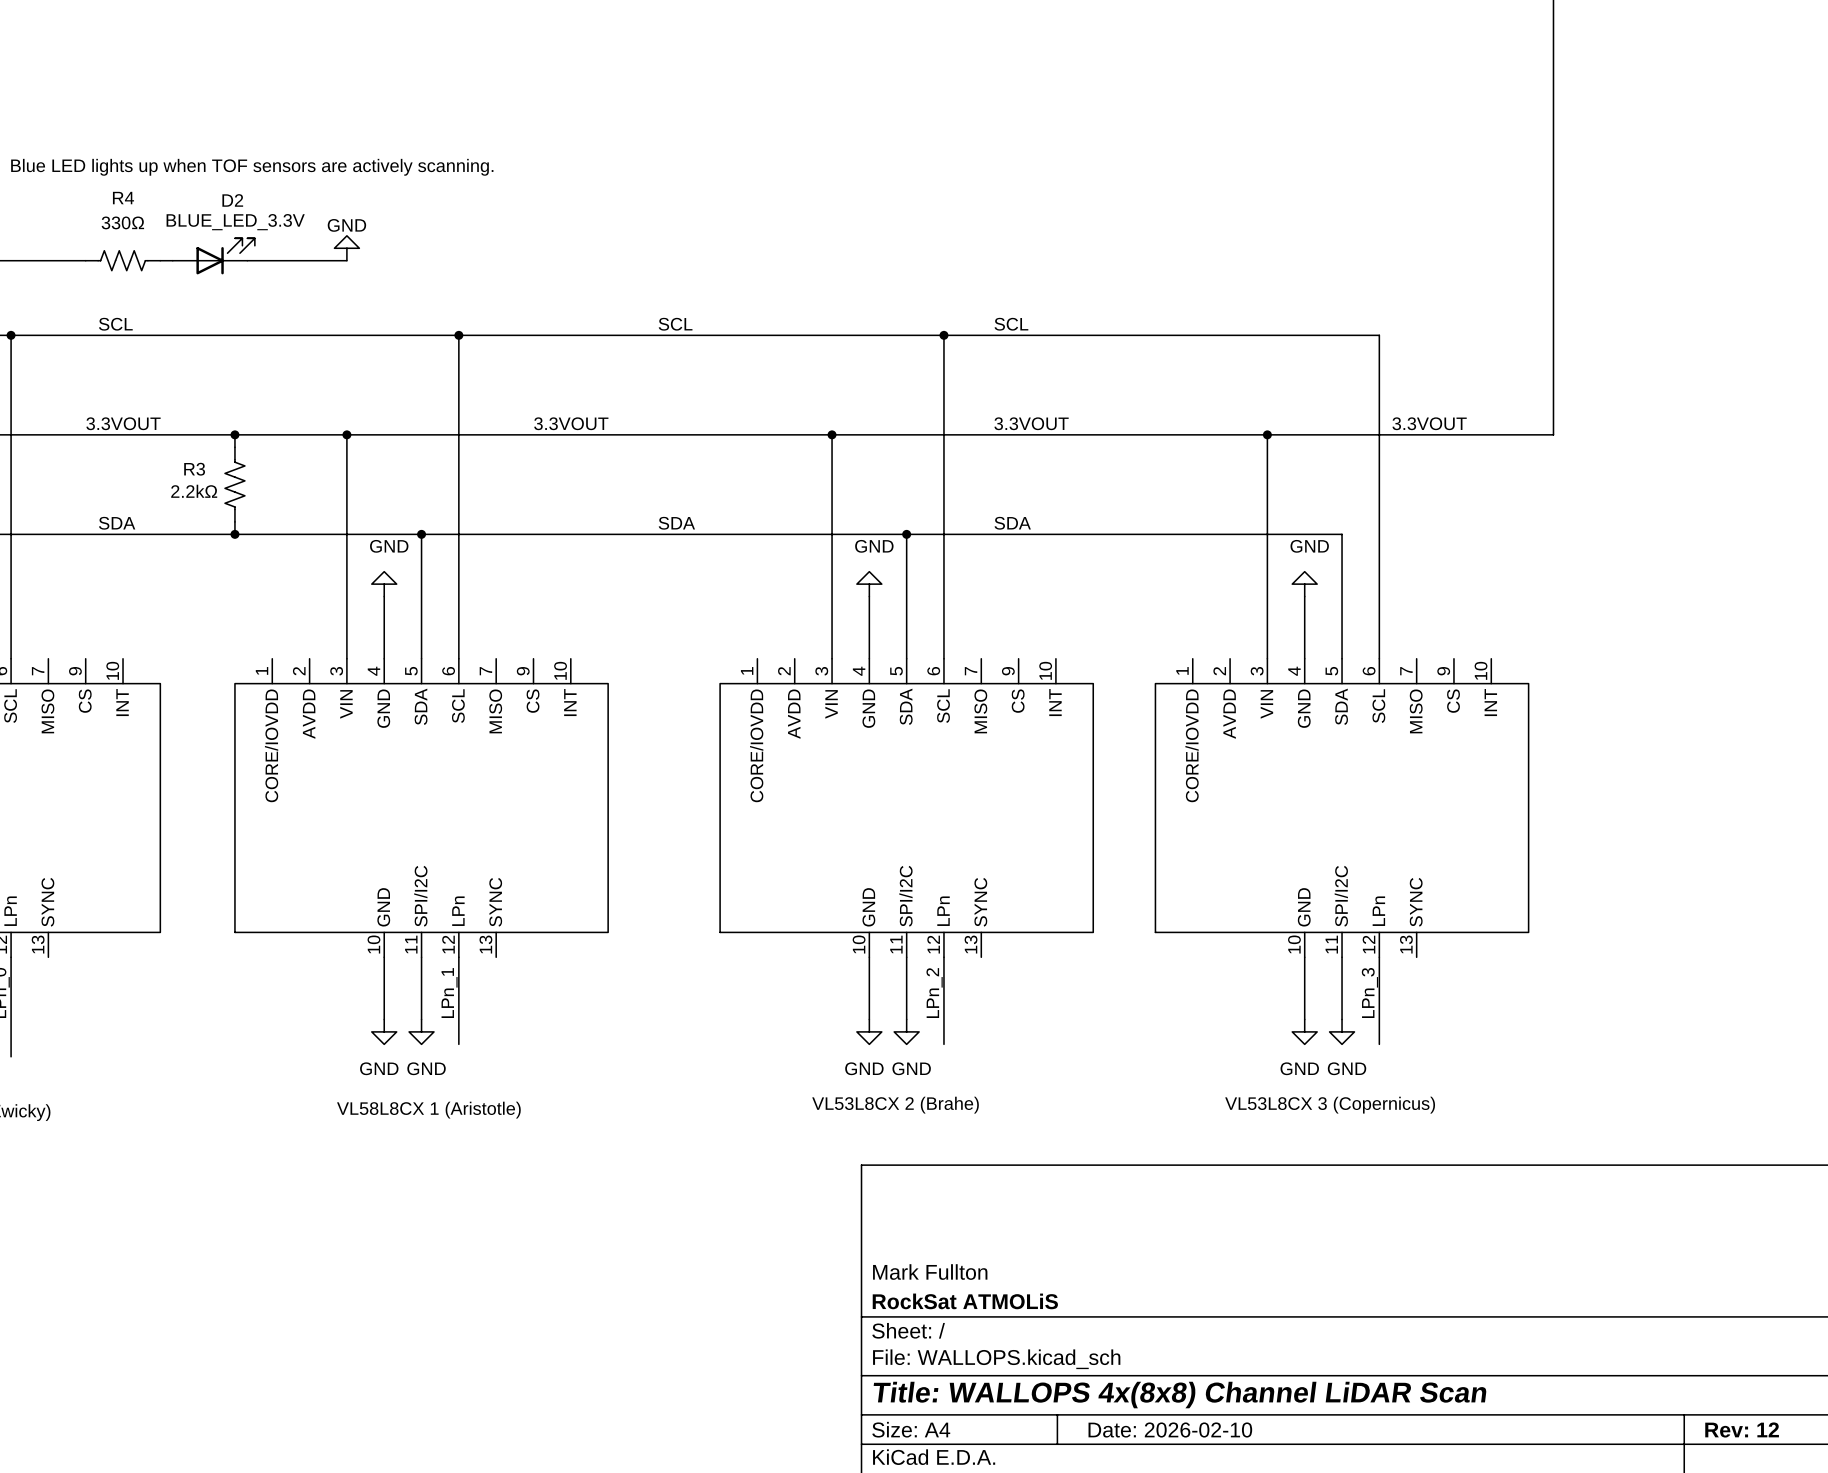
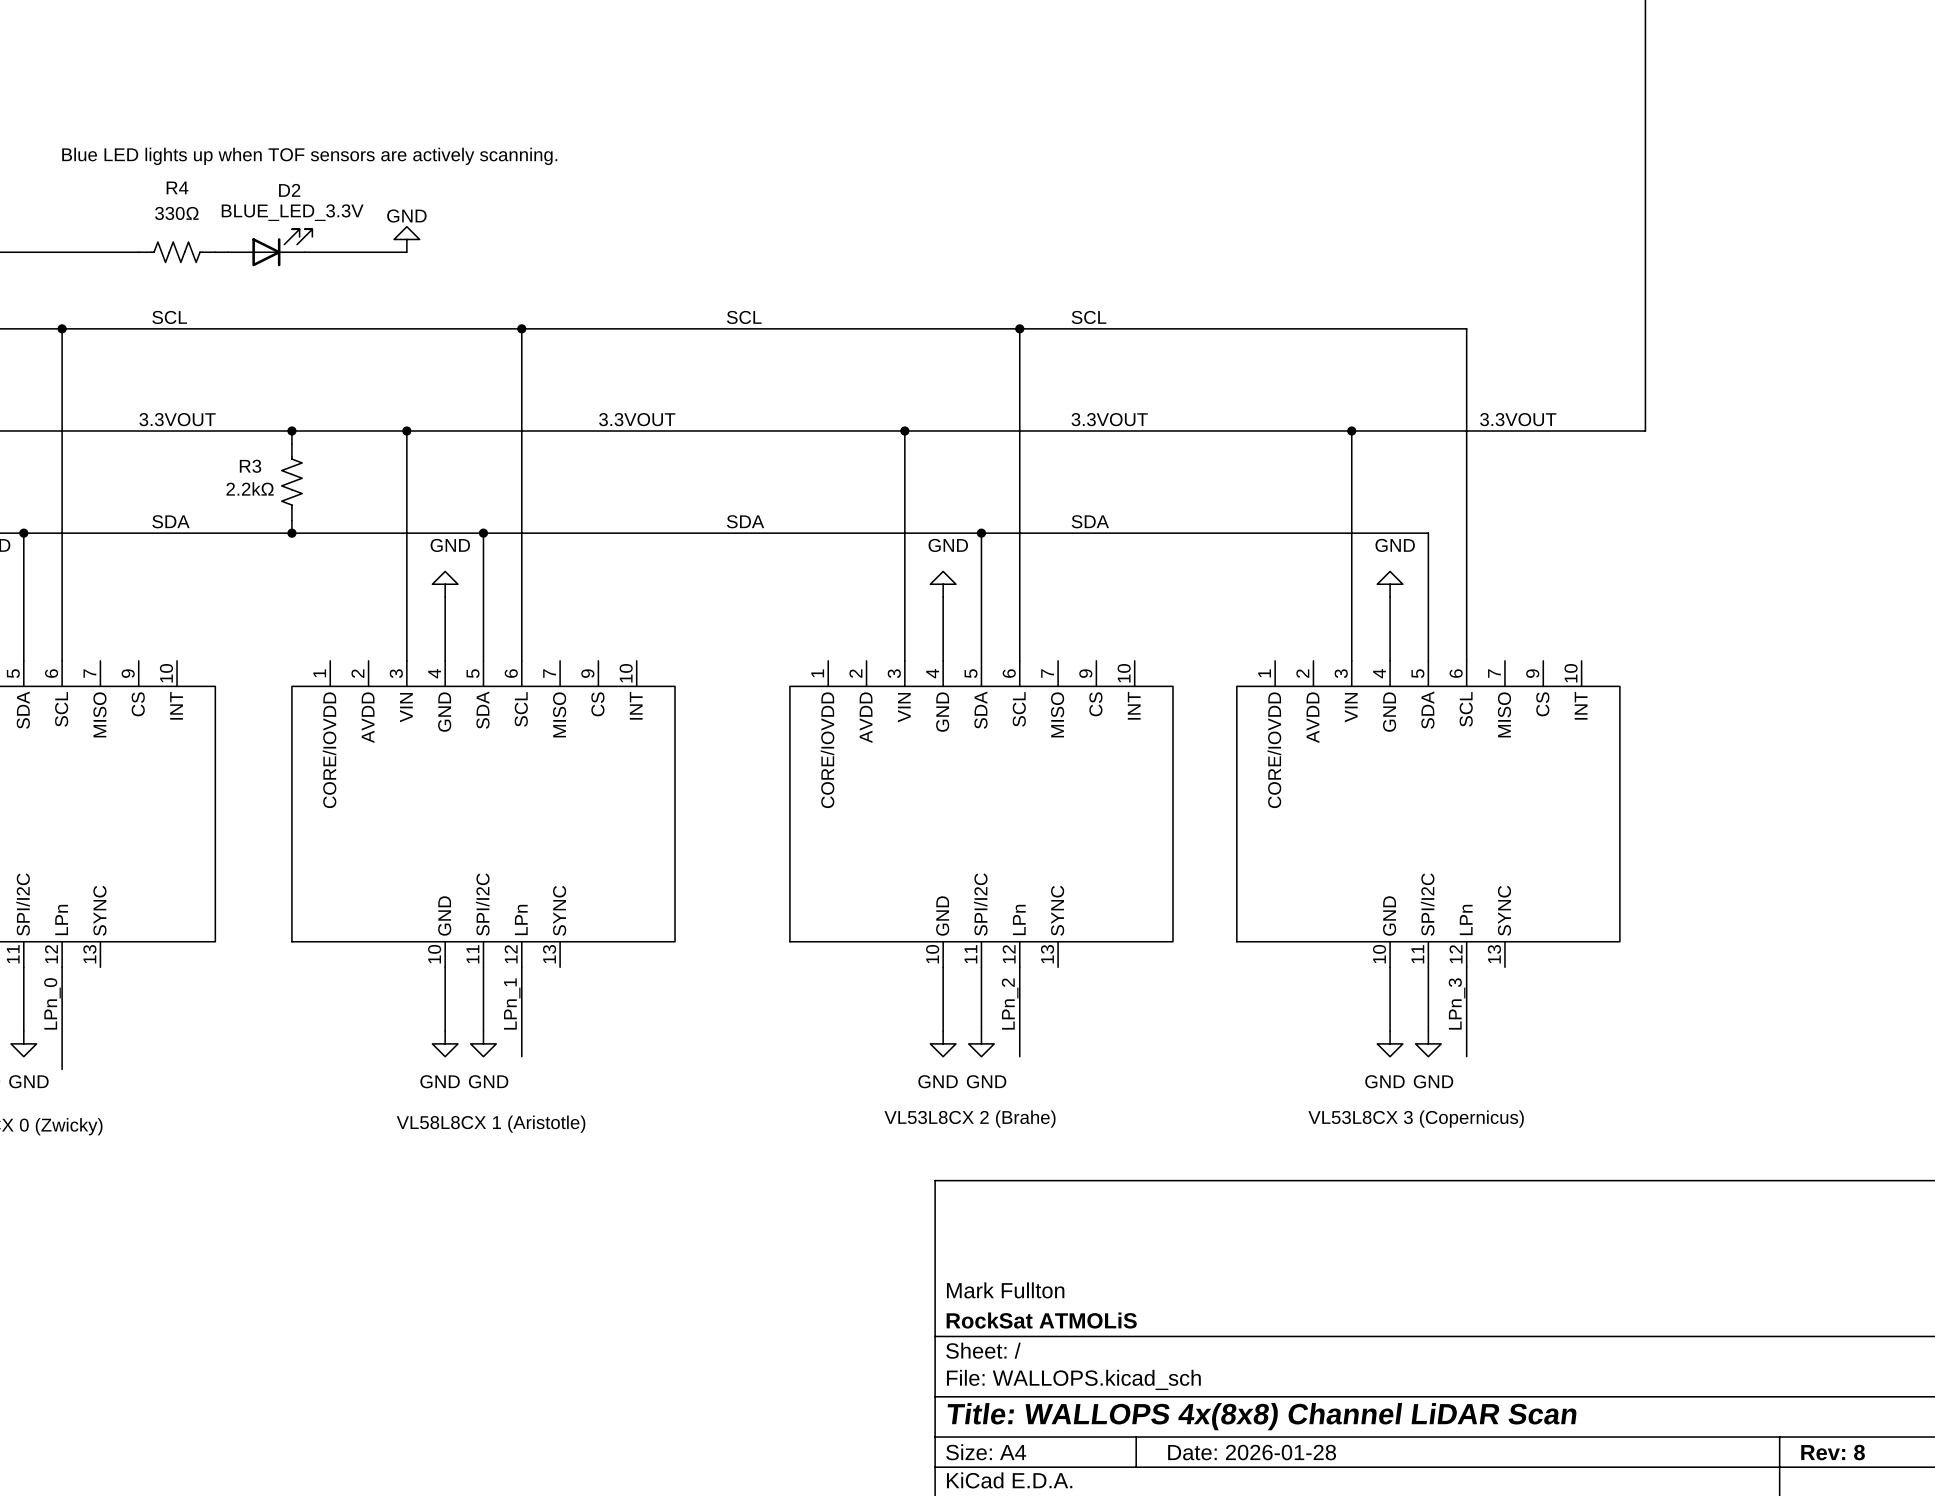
title block: Date: 2026-02-10 (1170, 1430) -> Date: 2026-01-28 (1252, 1452)
title block: Rev: 12 (1742, 1430) -> Rev: 8 (1833, 1452)

